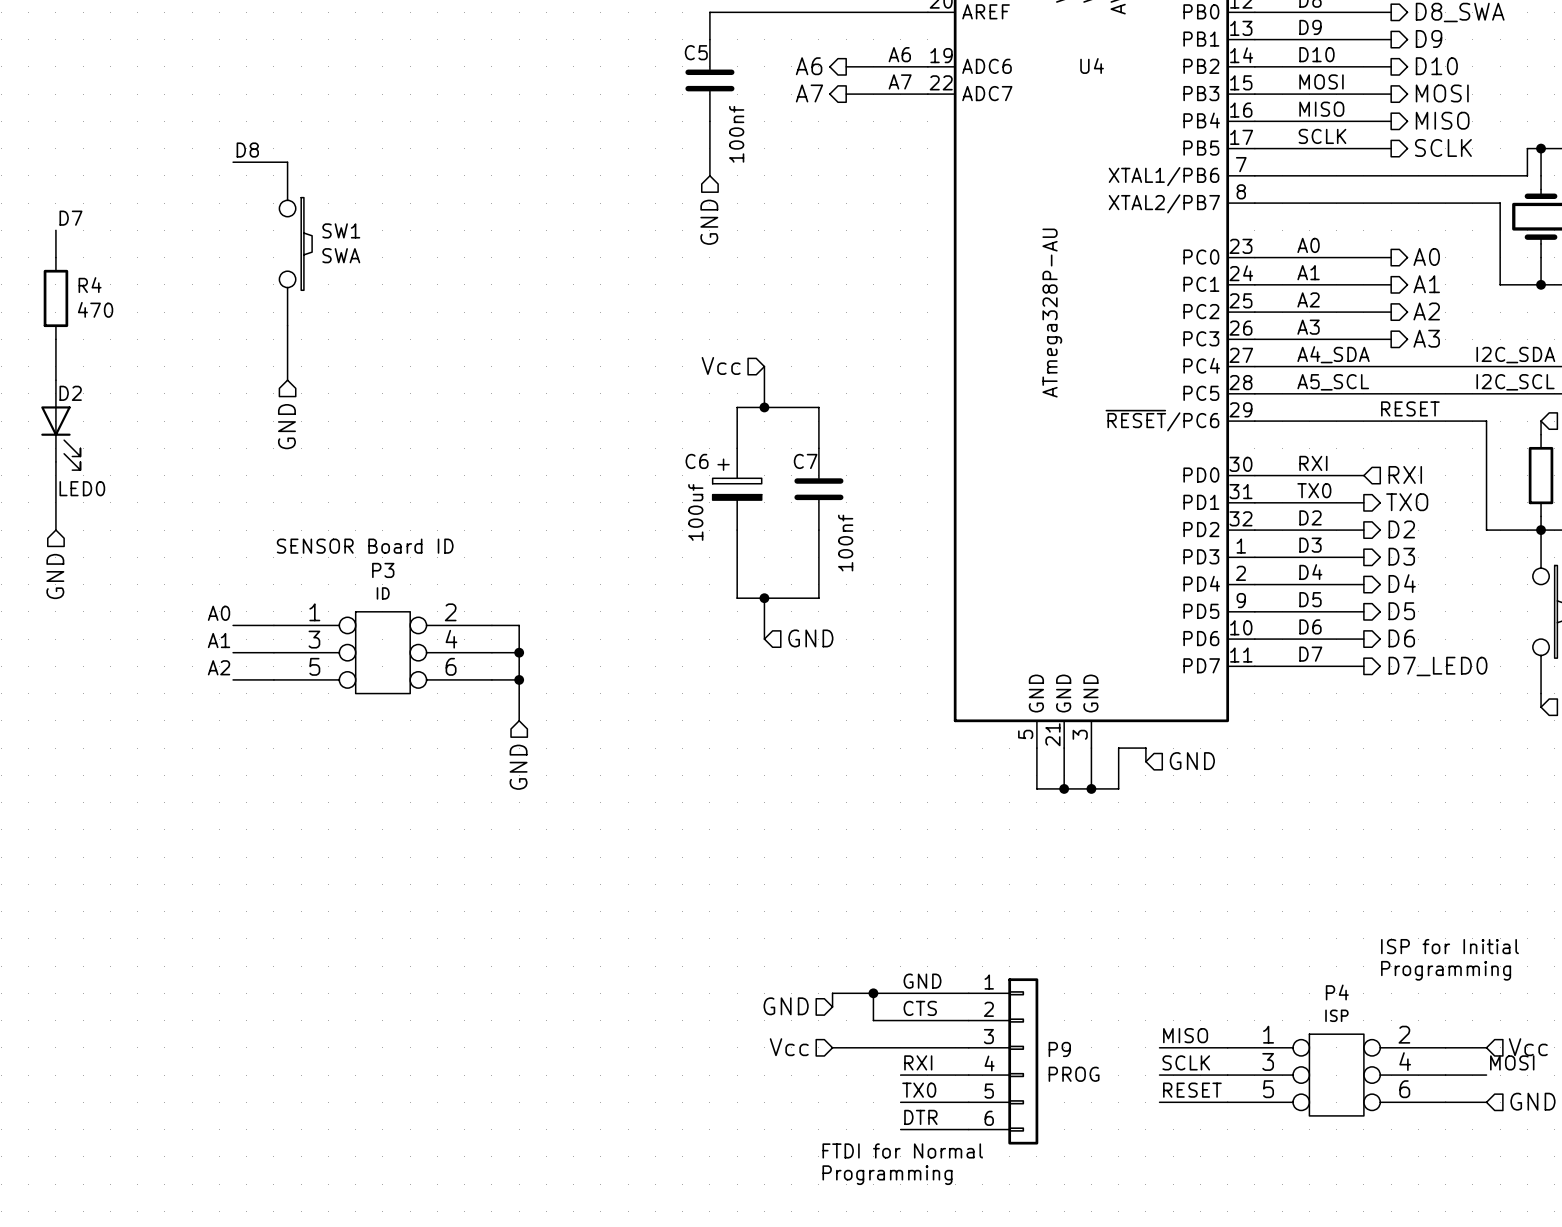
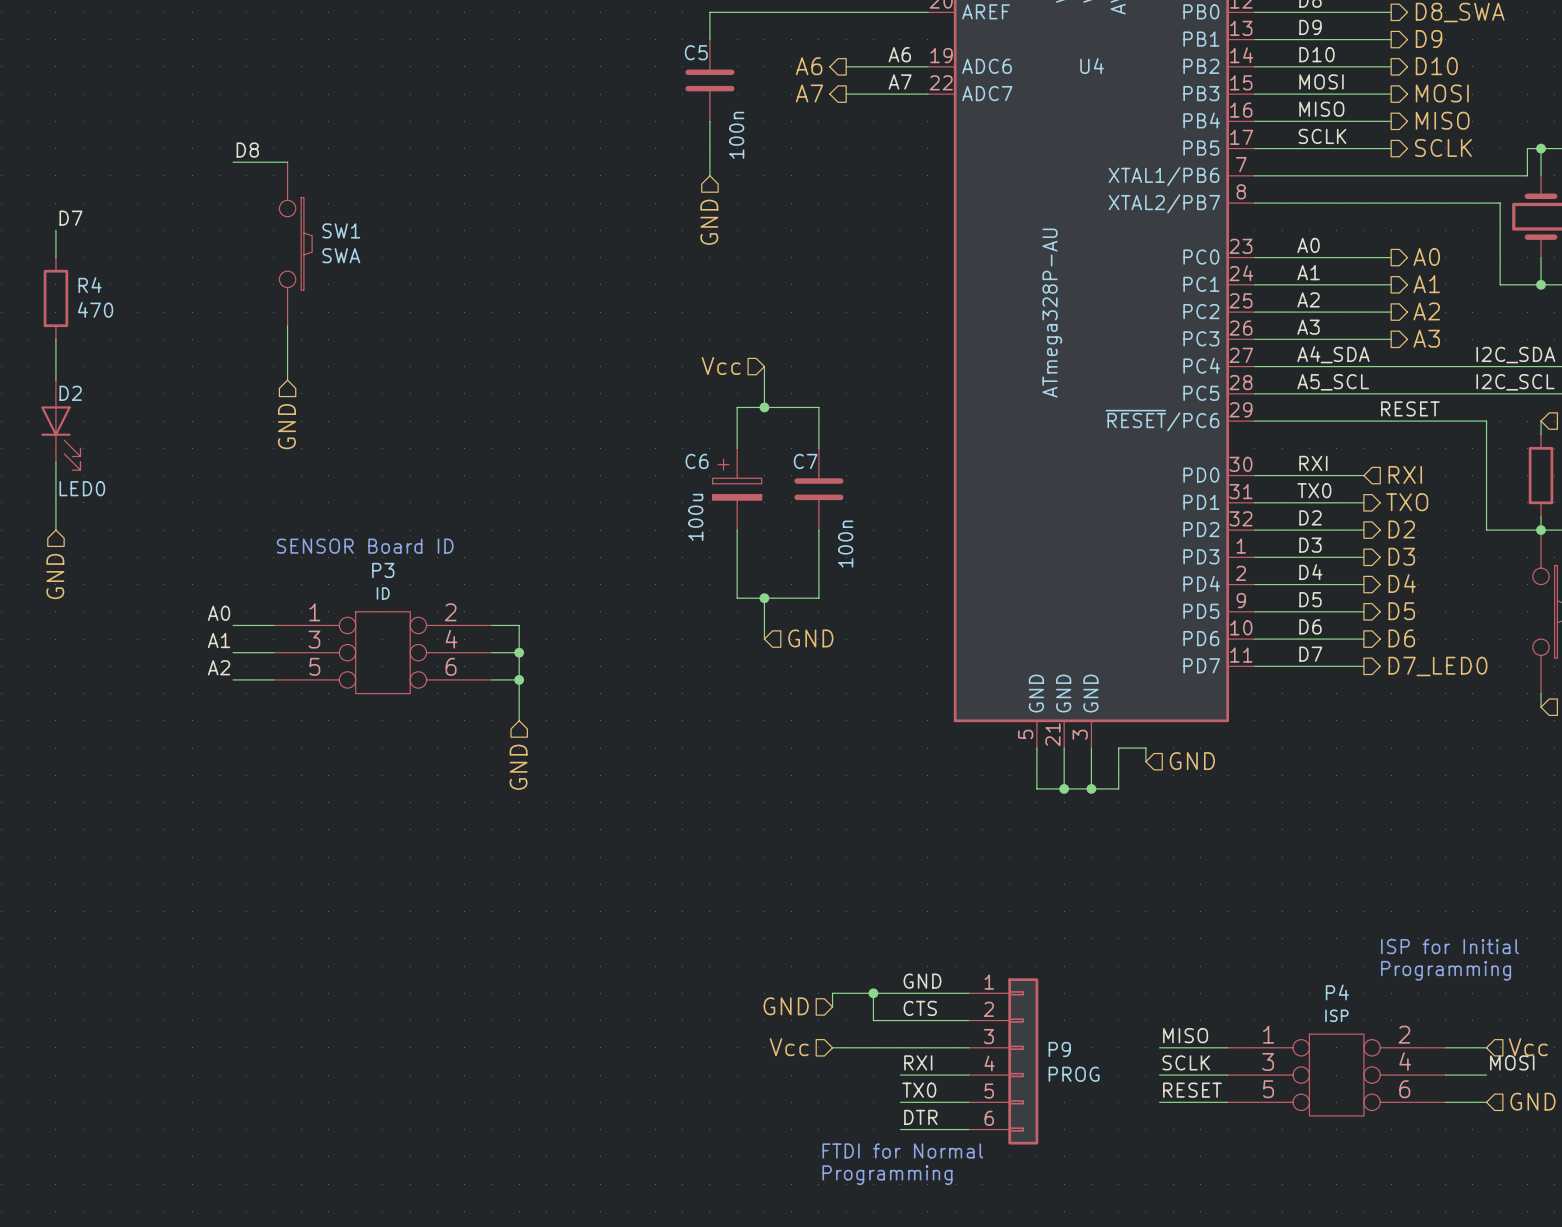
C5 value: 100nf (736, 134) -> 100n (736, 135)
C6 value: 100uf (695, 512) -> 100u (695, 517)
C7 value: 100nf (845, 543) -> 100n (845, 544)

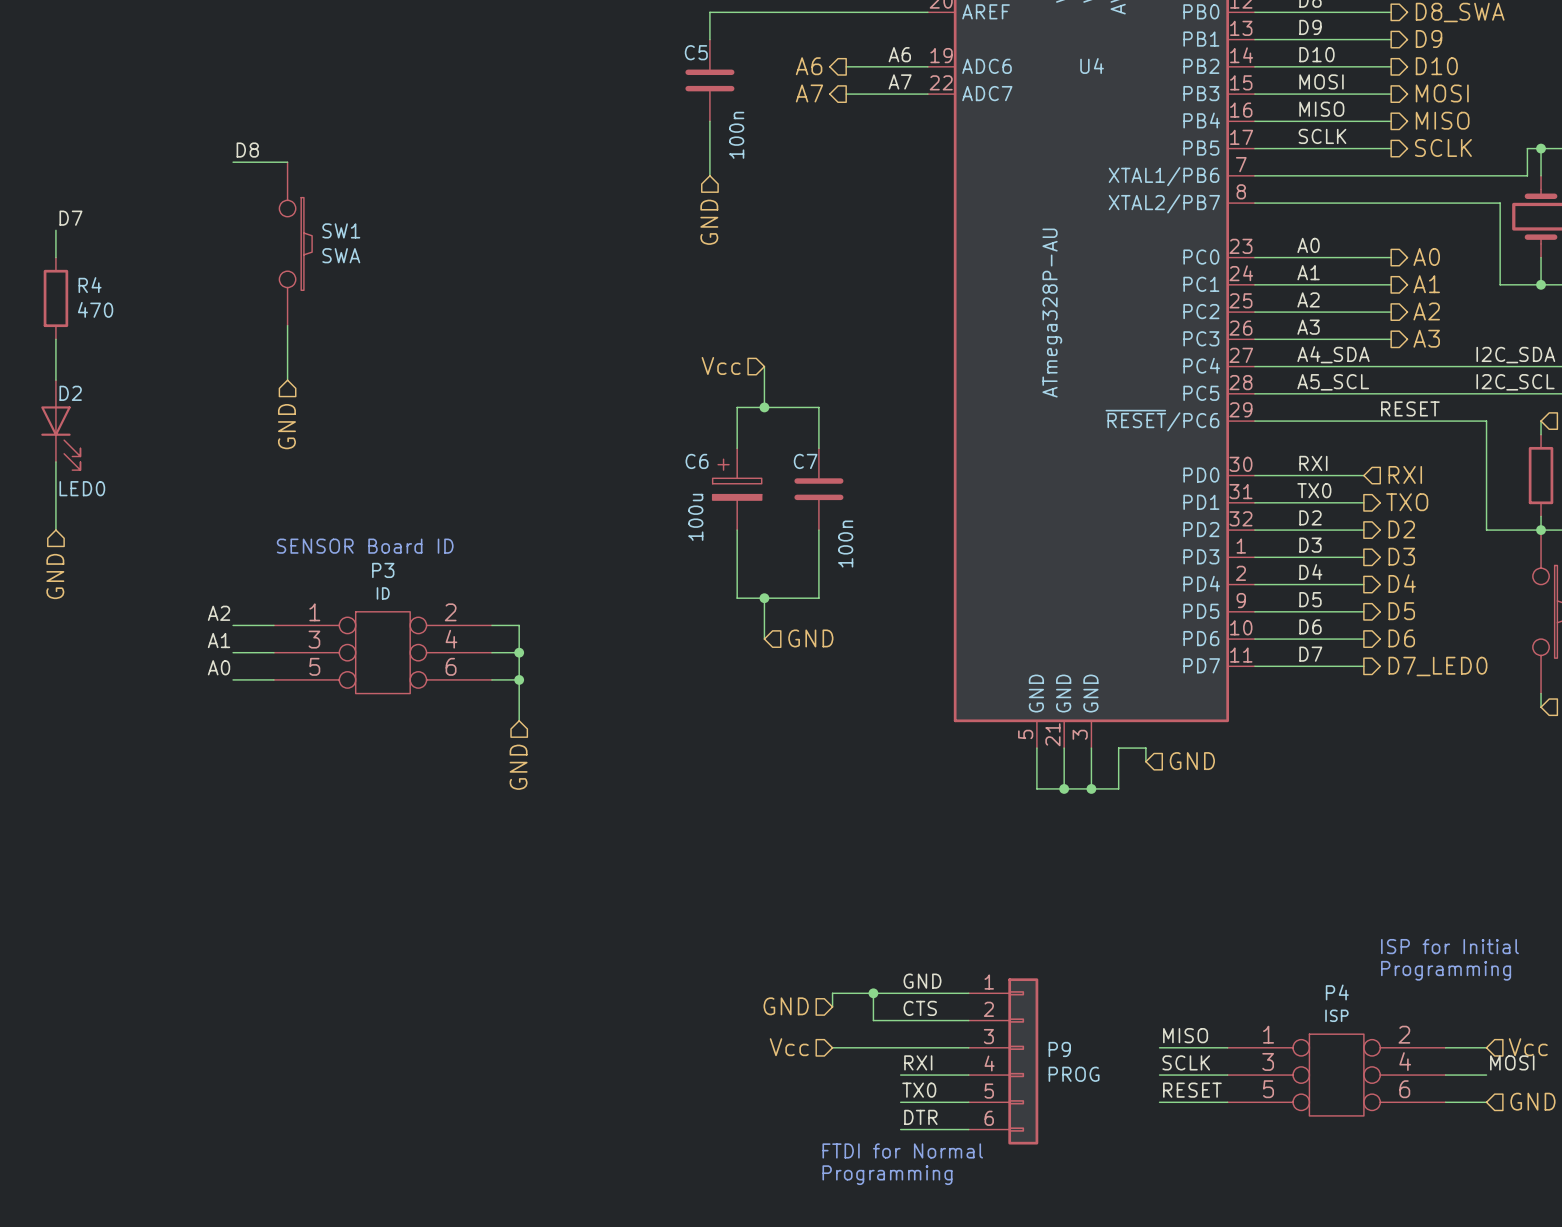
label: A0 (219, 613) -> A2 (219, 613)
label: A2 (219, 667) -> A0 (219, 667)

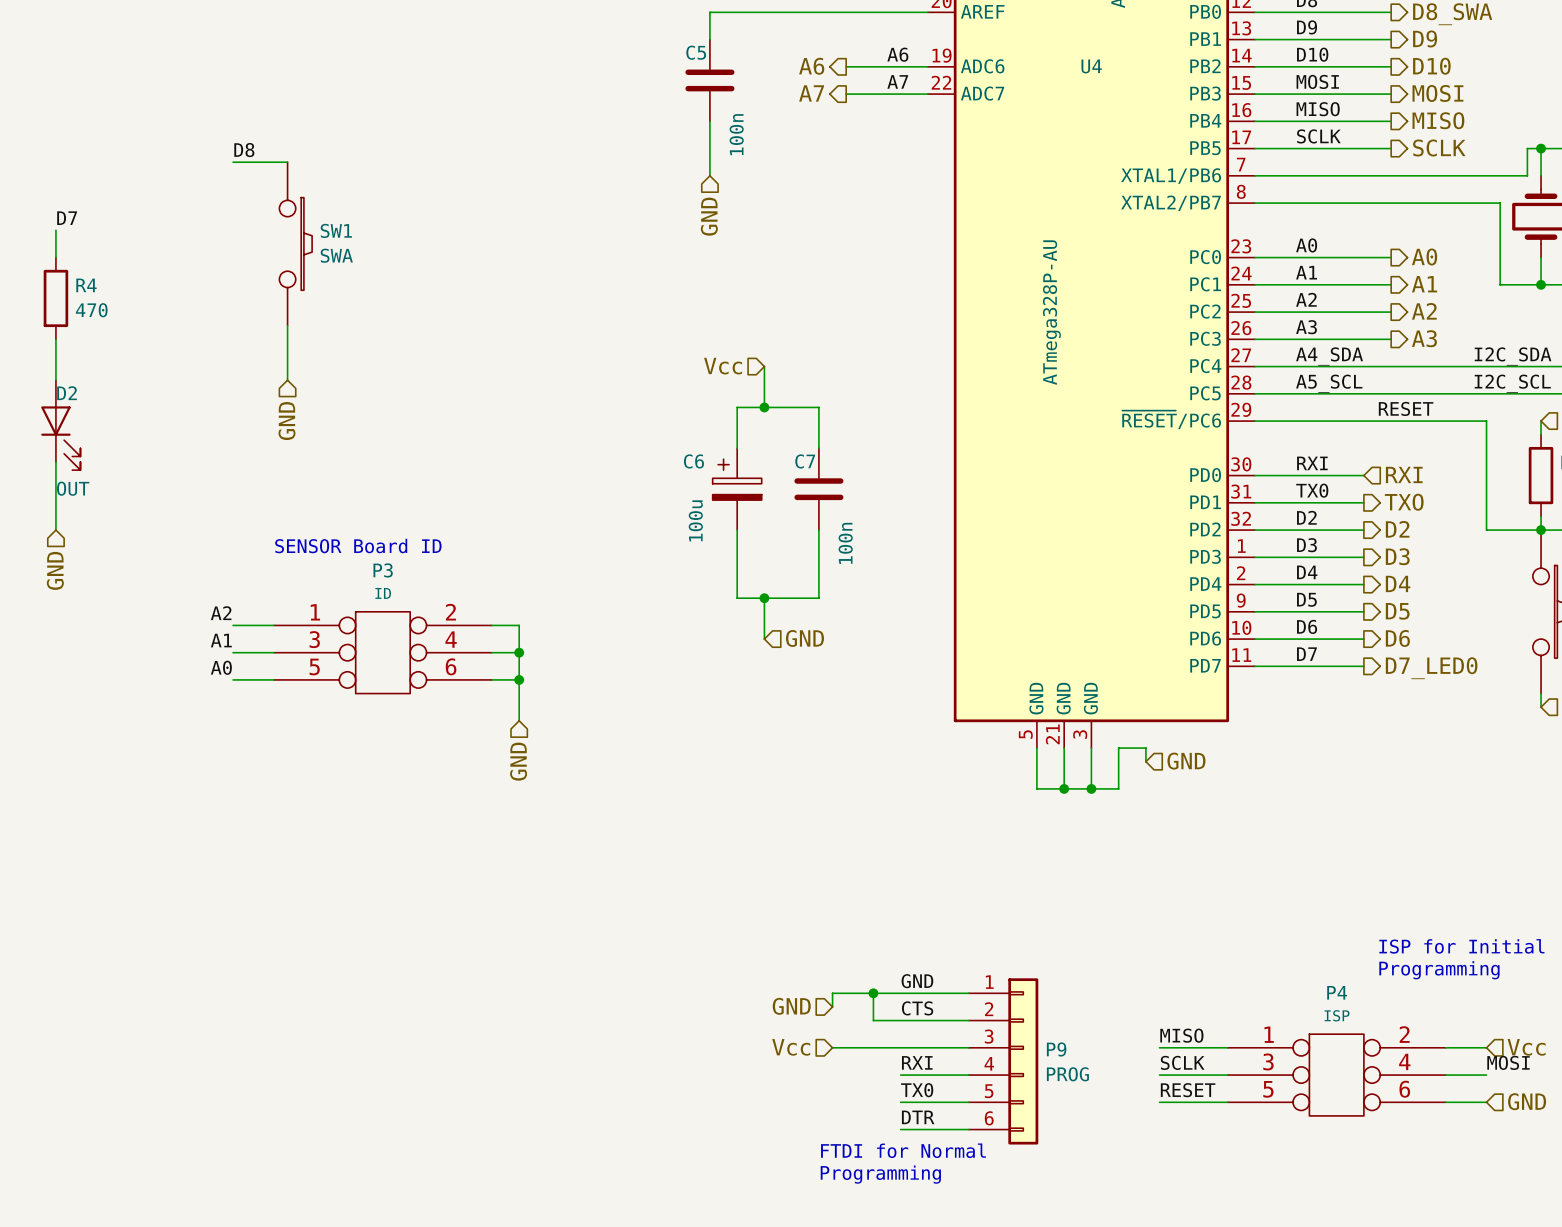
D2 value: LED0 (82, 488) -> OUT (73, 488)

